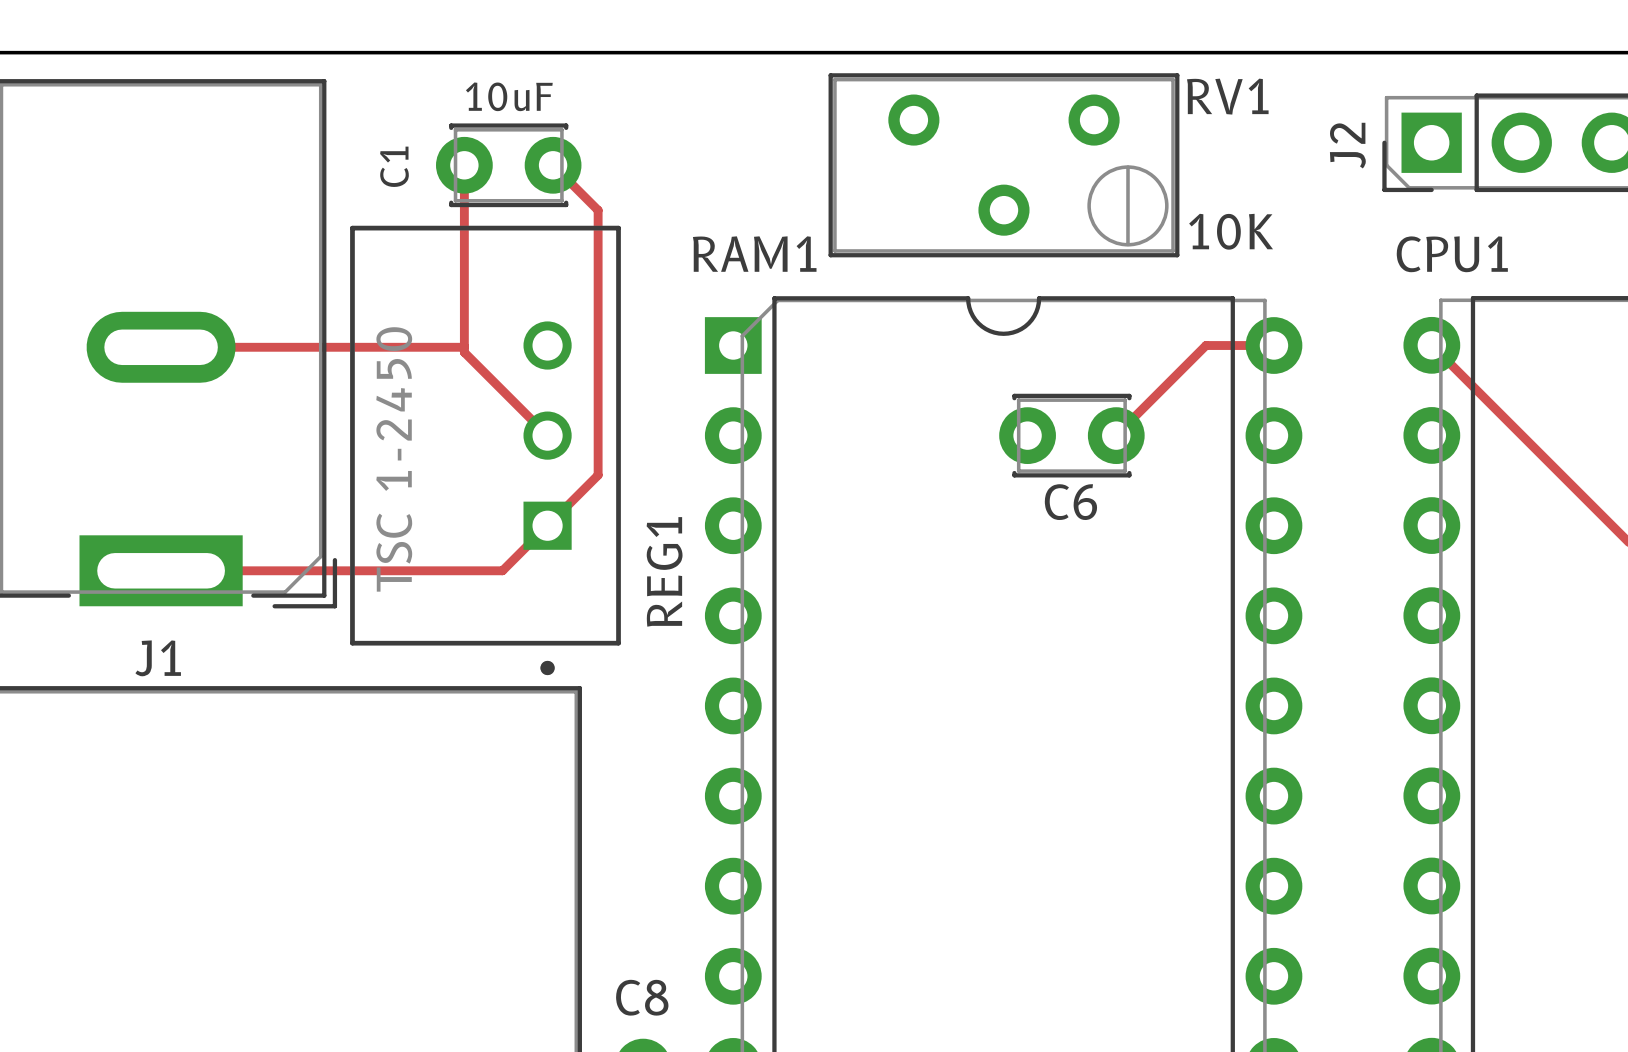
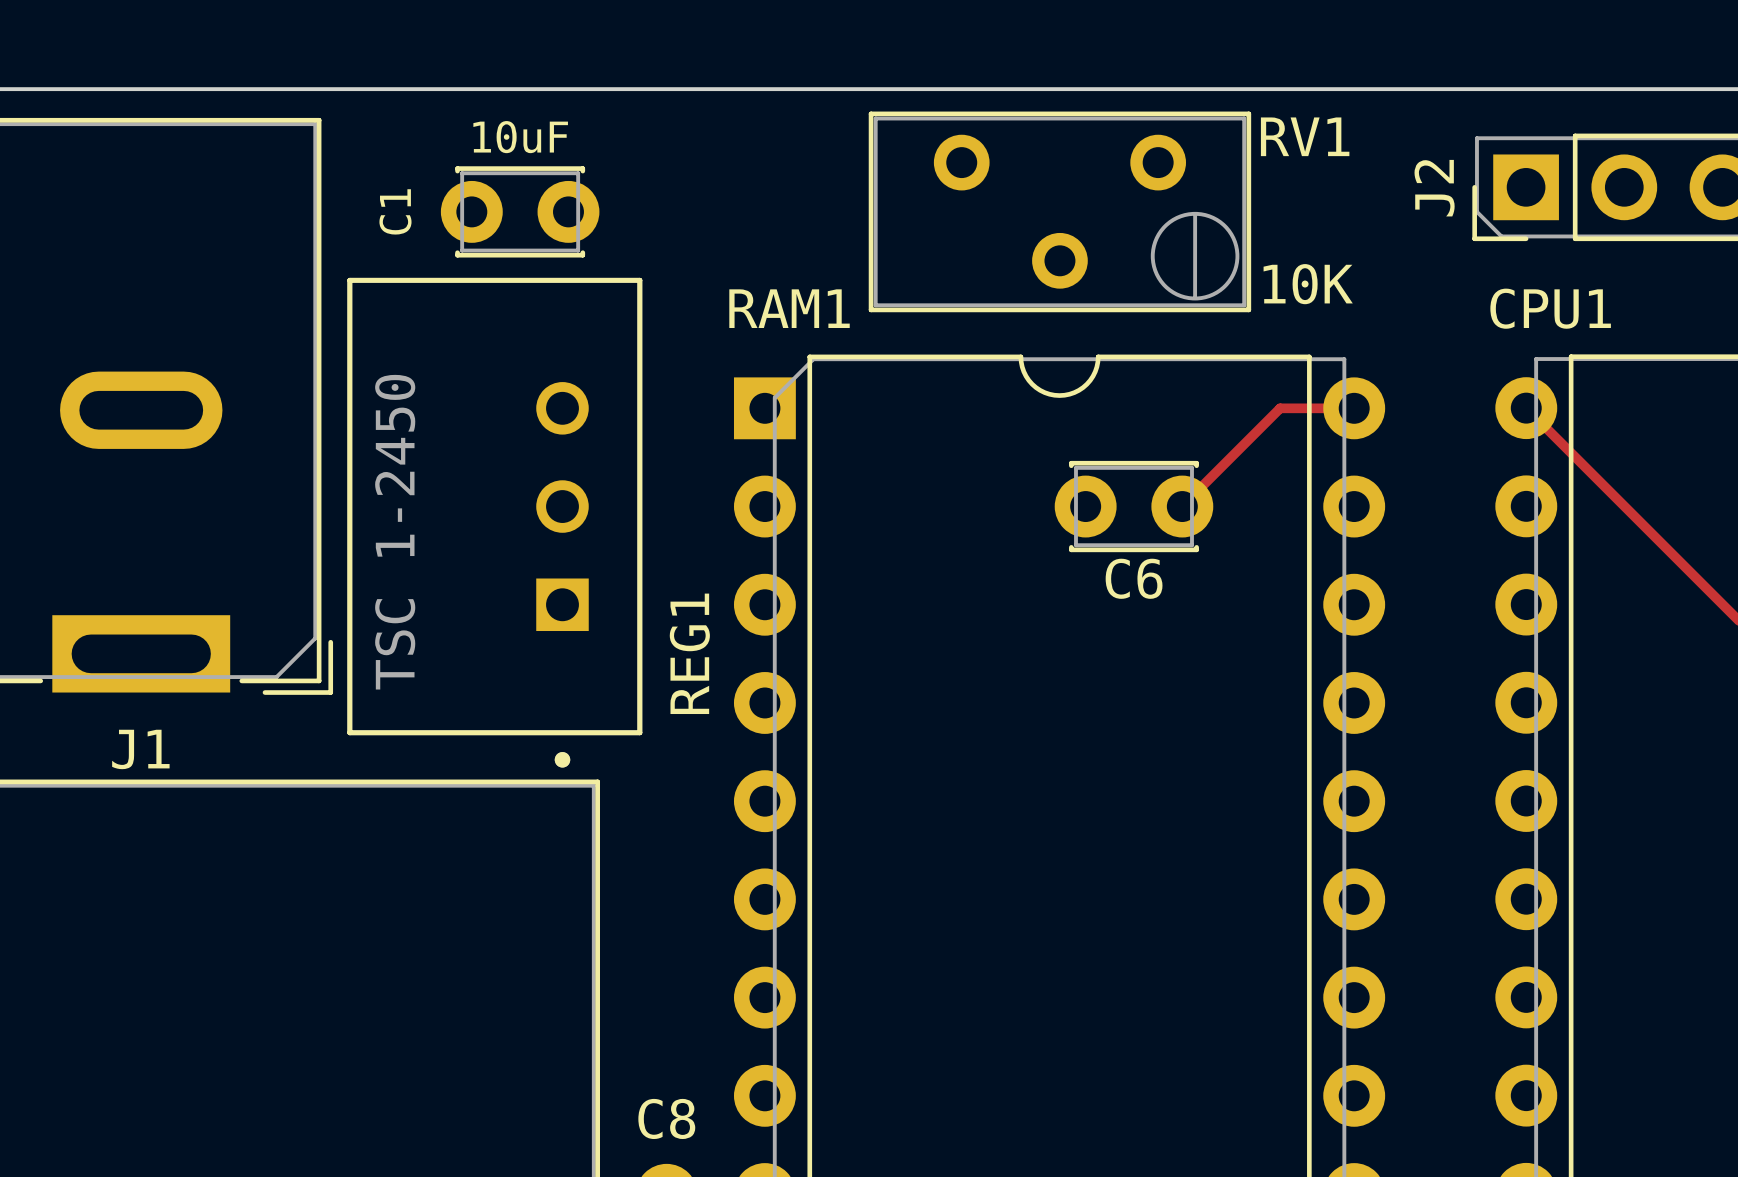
track: (464, 165) (464, 352) (547, 435) -> none
track: (553, 165) (598, 210) (598, 475) (502, 570) (161, 570) -> none
track: (161, 347) (464, 347) -> none

